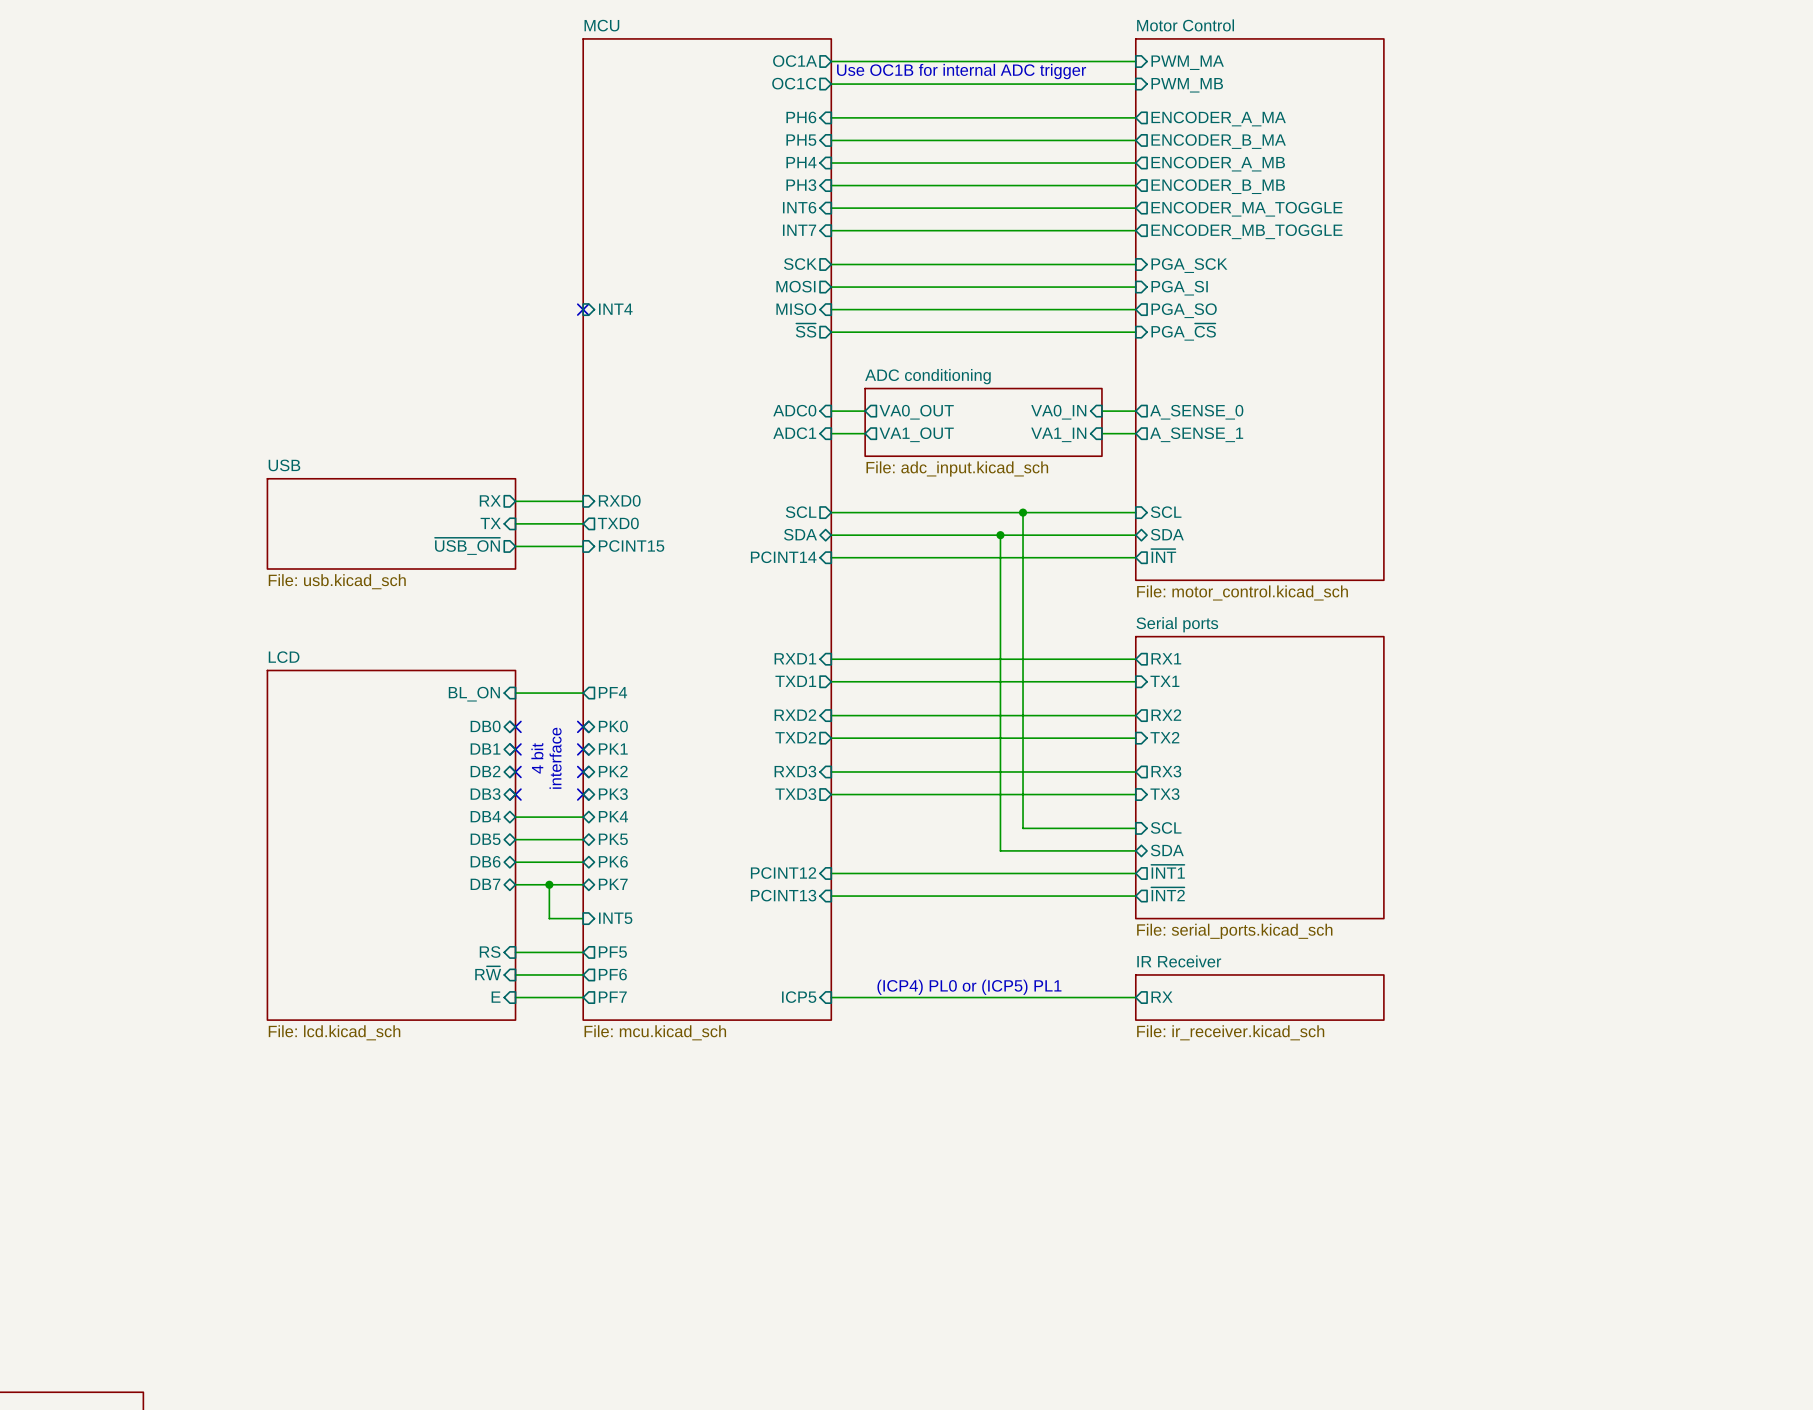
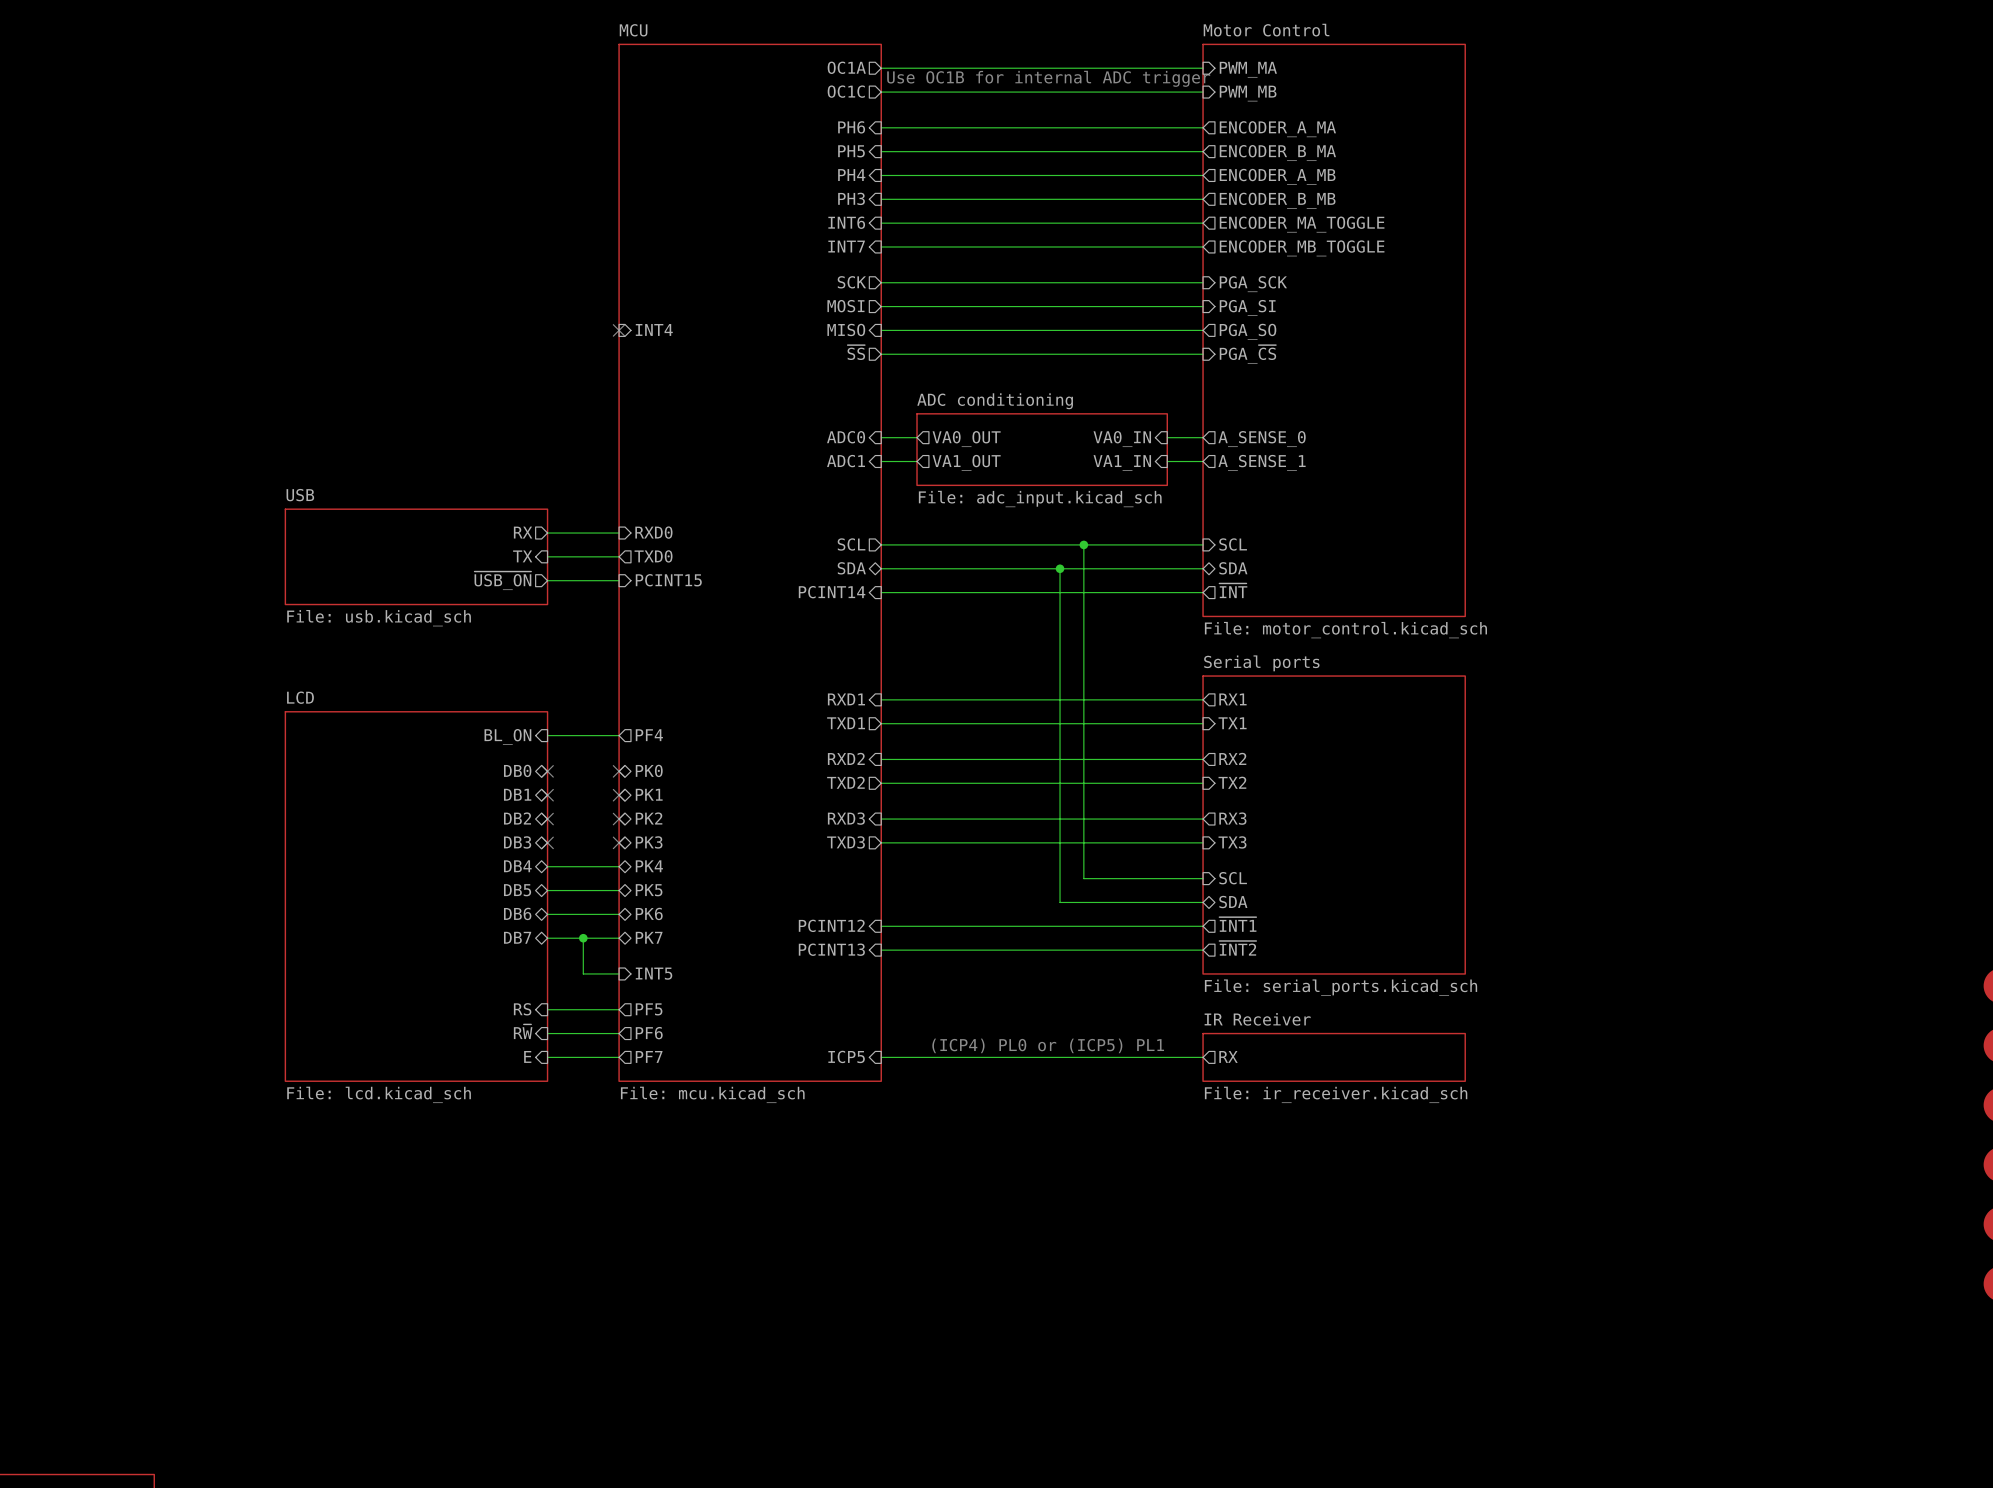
text: 4 bit (537, 758) -> none
text: interface (555, 758) -> none

